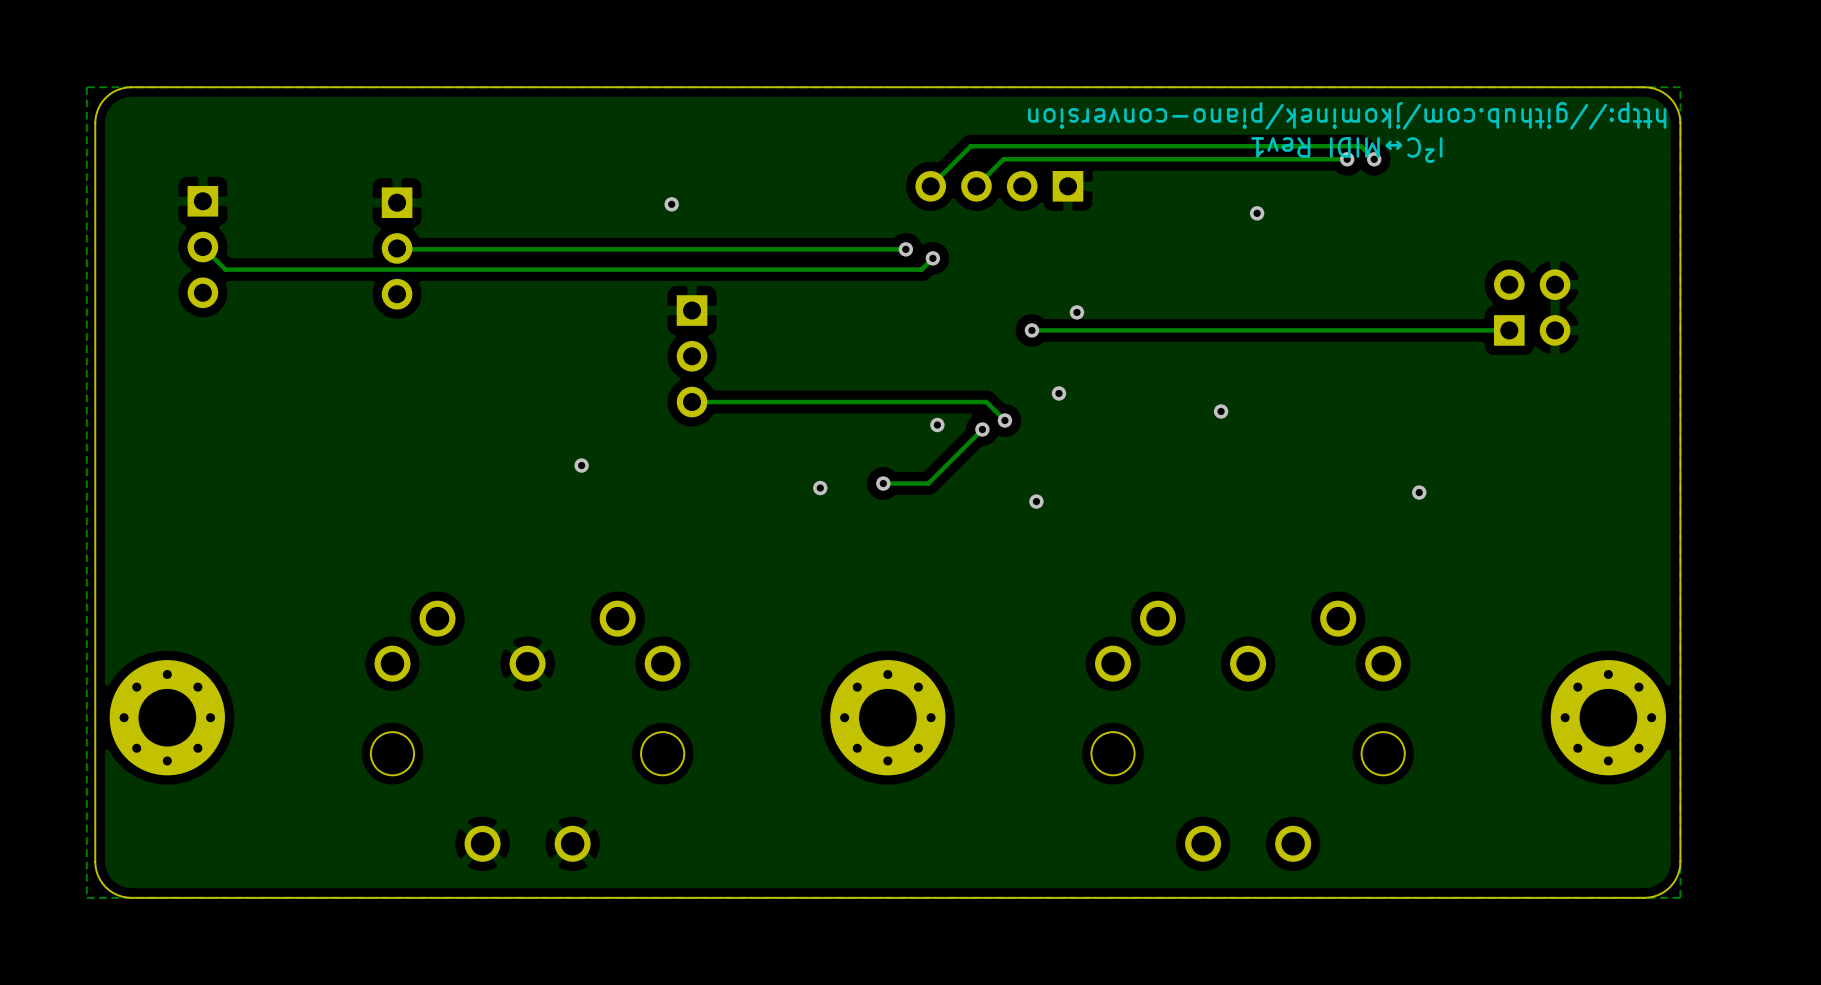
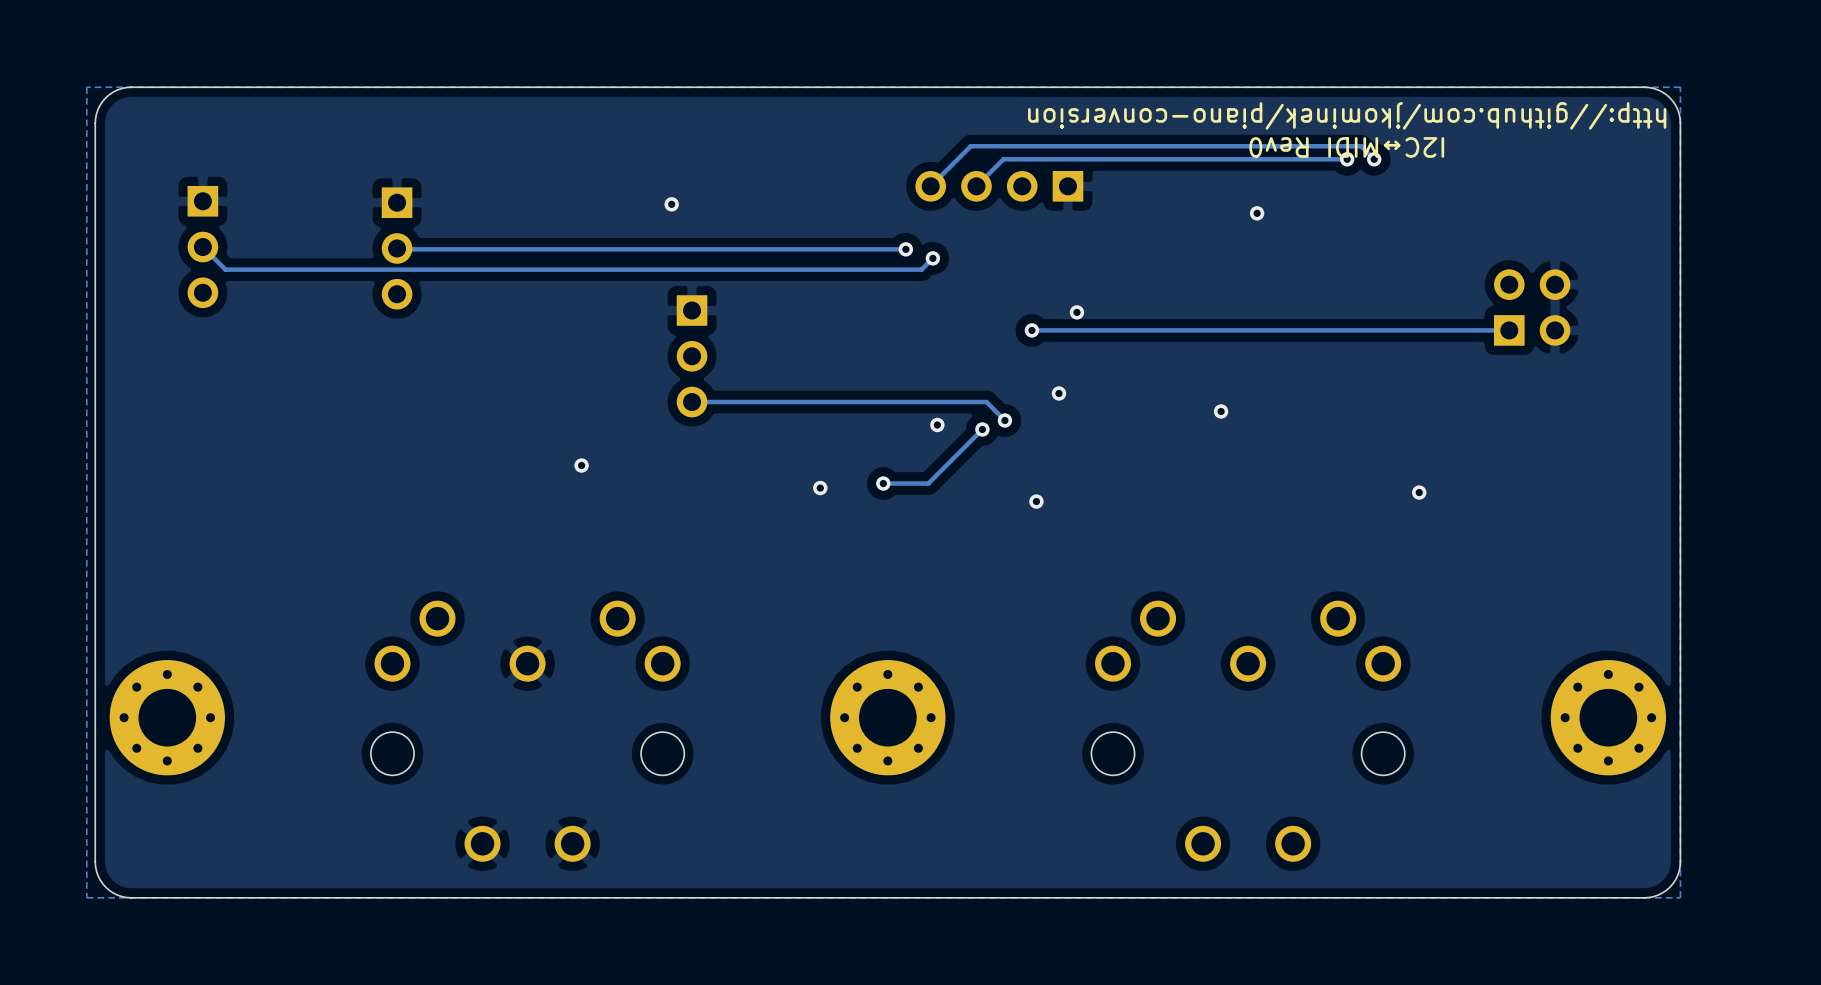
text: I²C↔MIDI Rev1 (1346, 150) -> I2C↔MIDI Rev0 (1346, 147)

